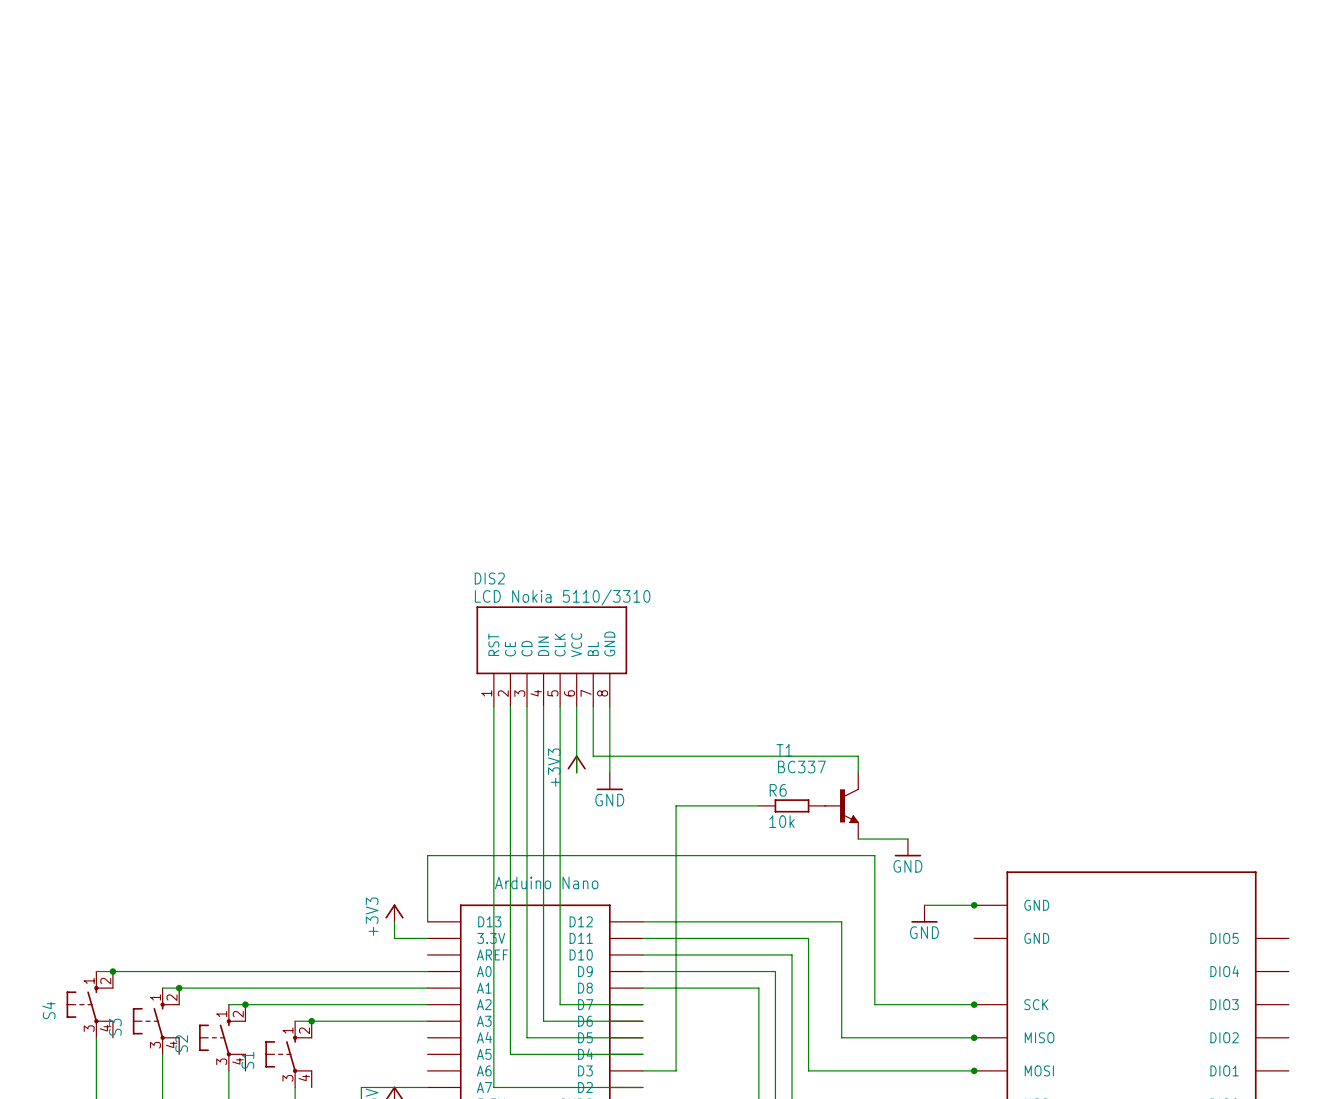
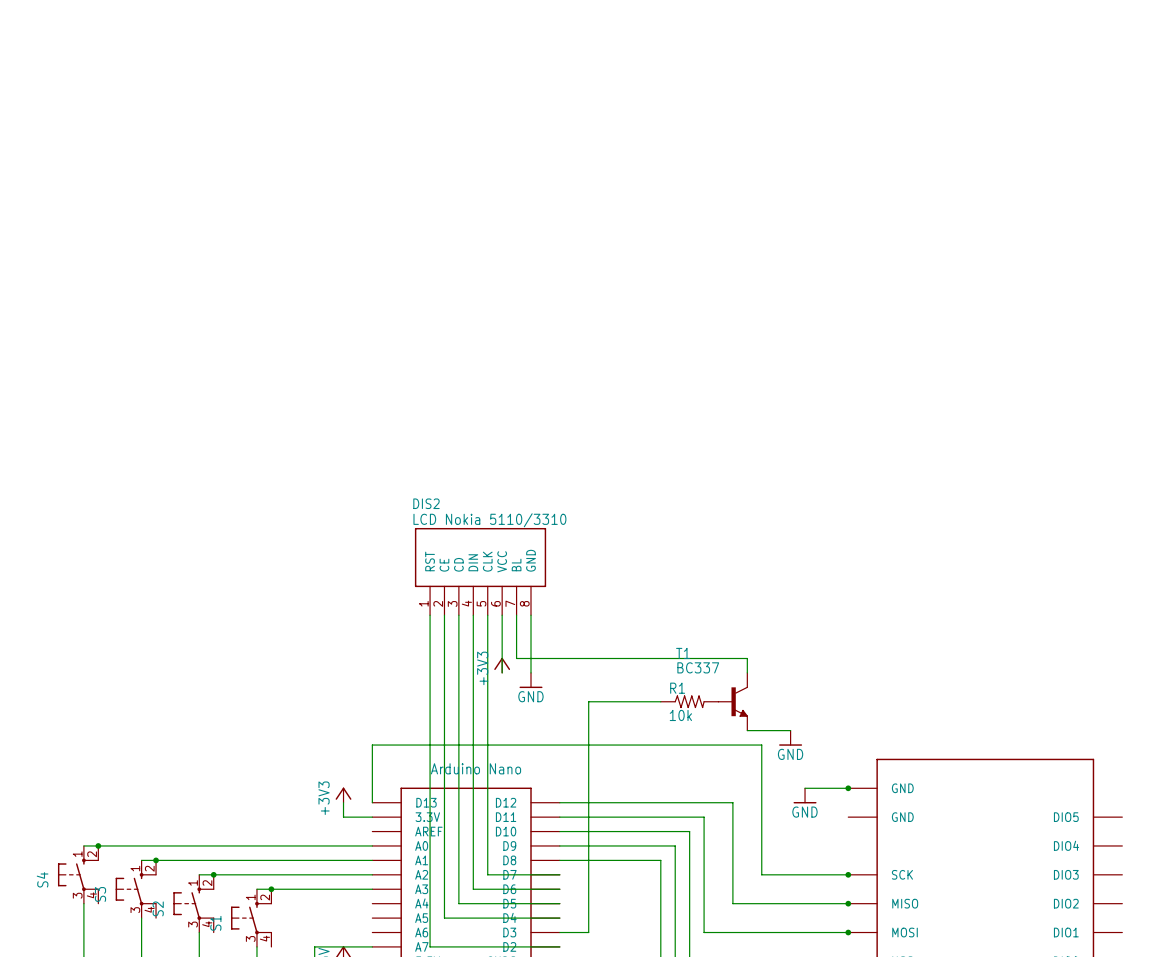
R6: 10k (792, 805) -> none
R1: none -> 10k (689, 701)

